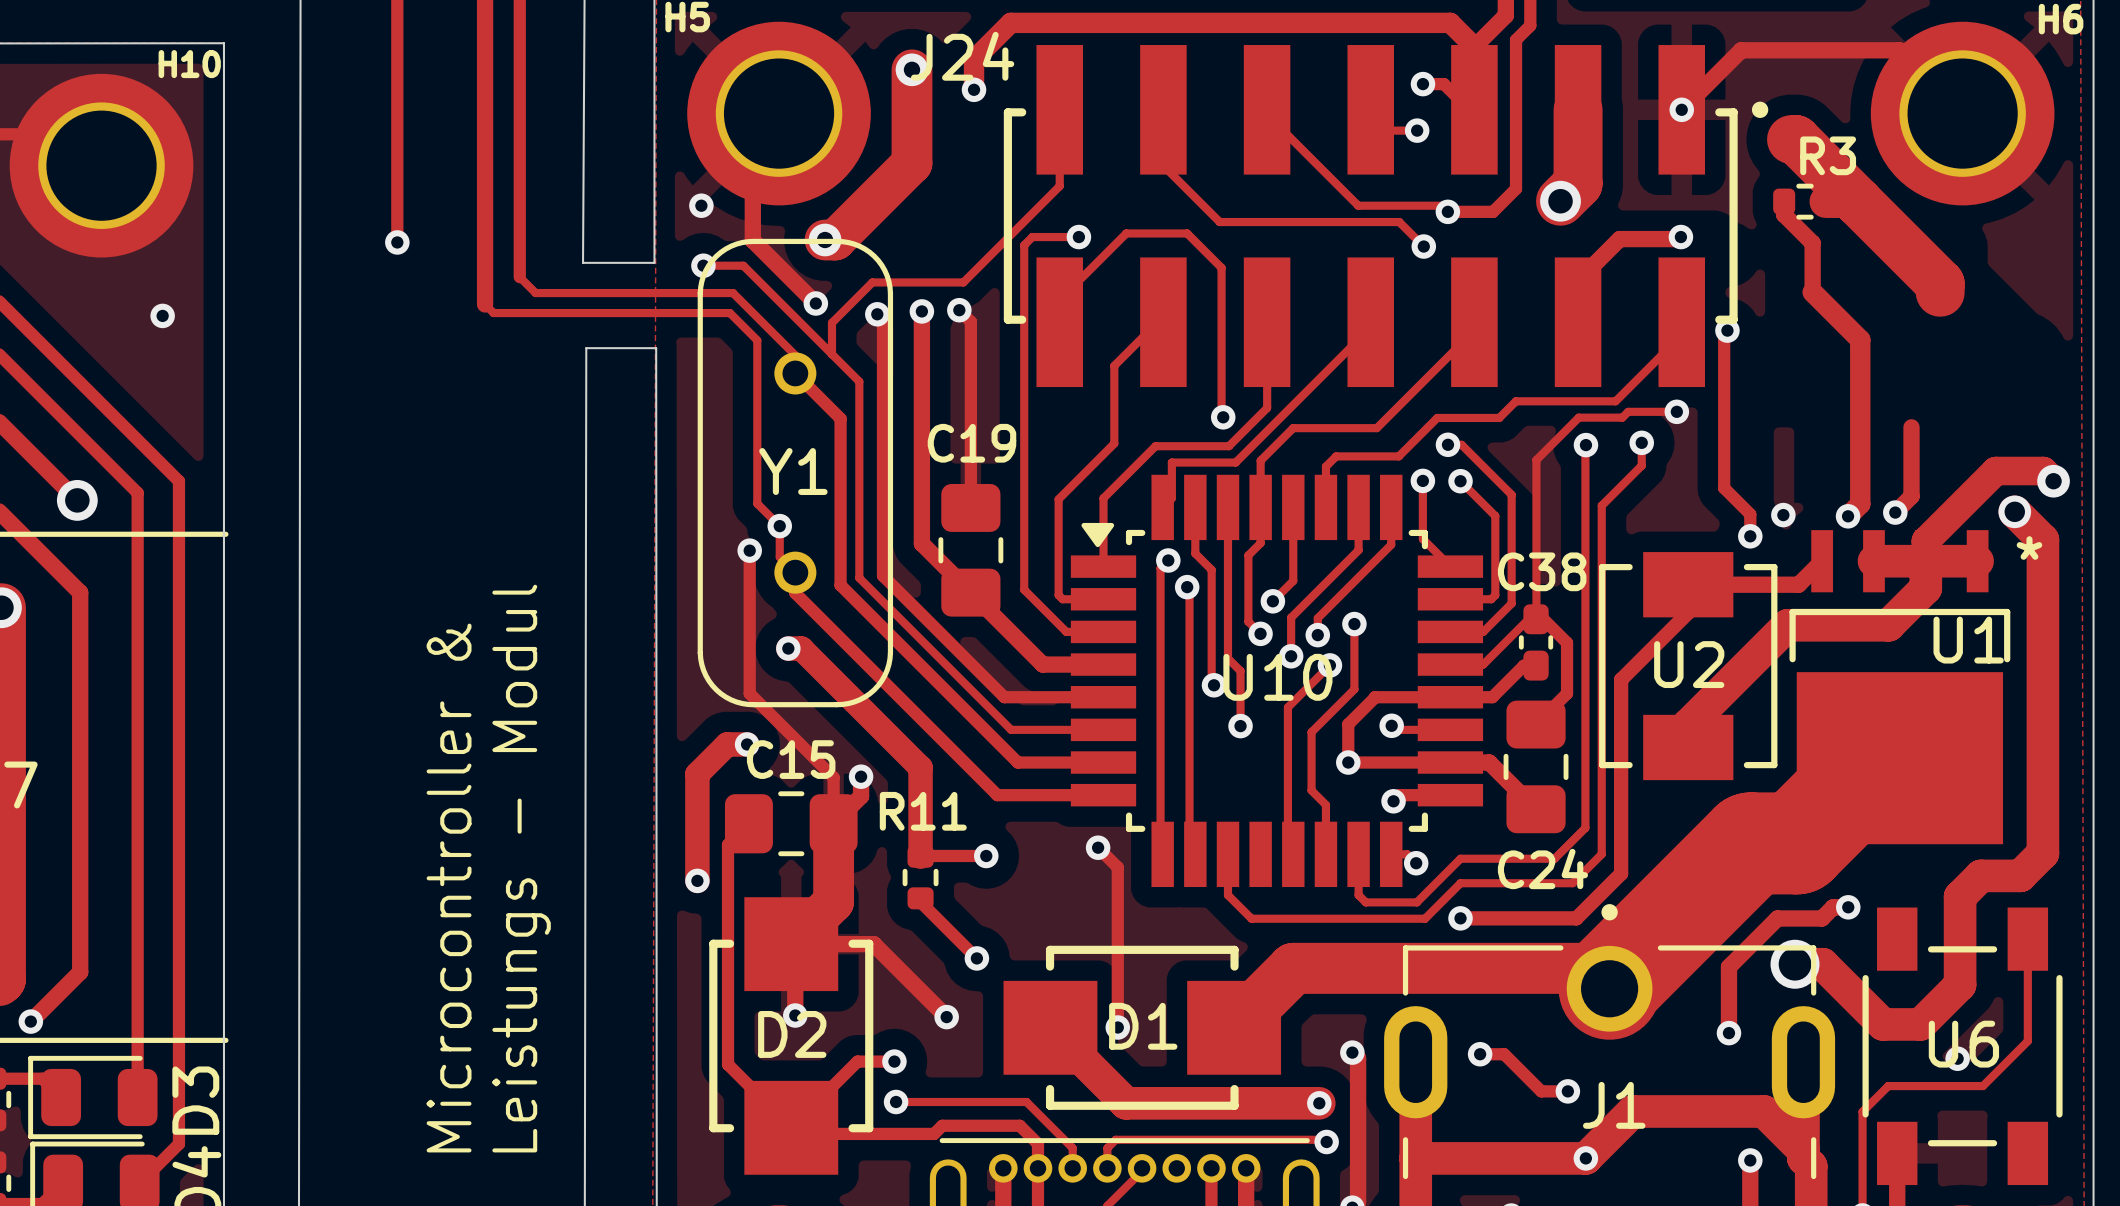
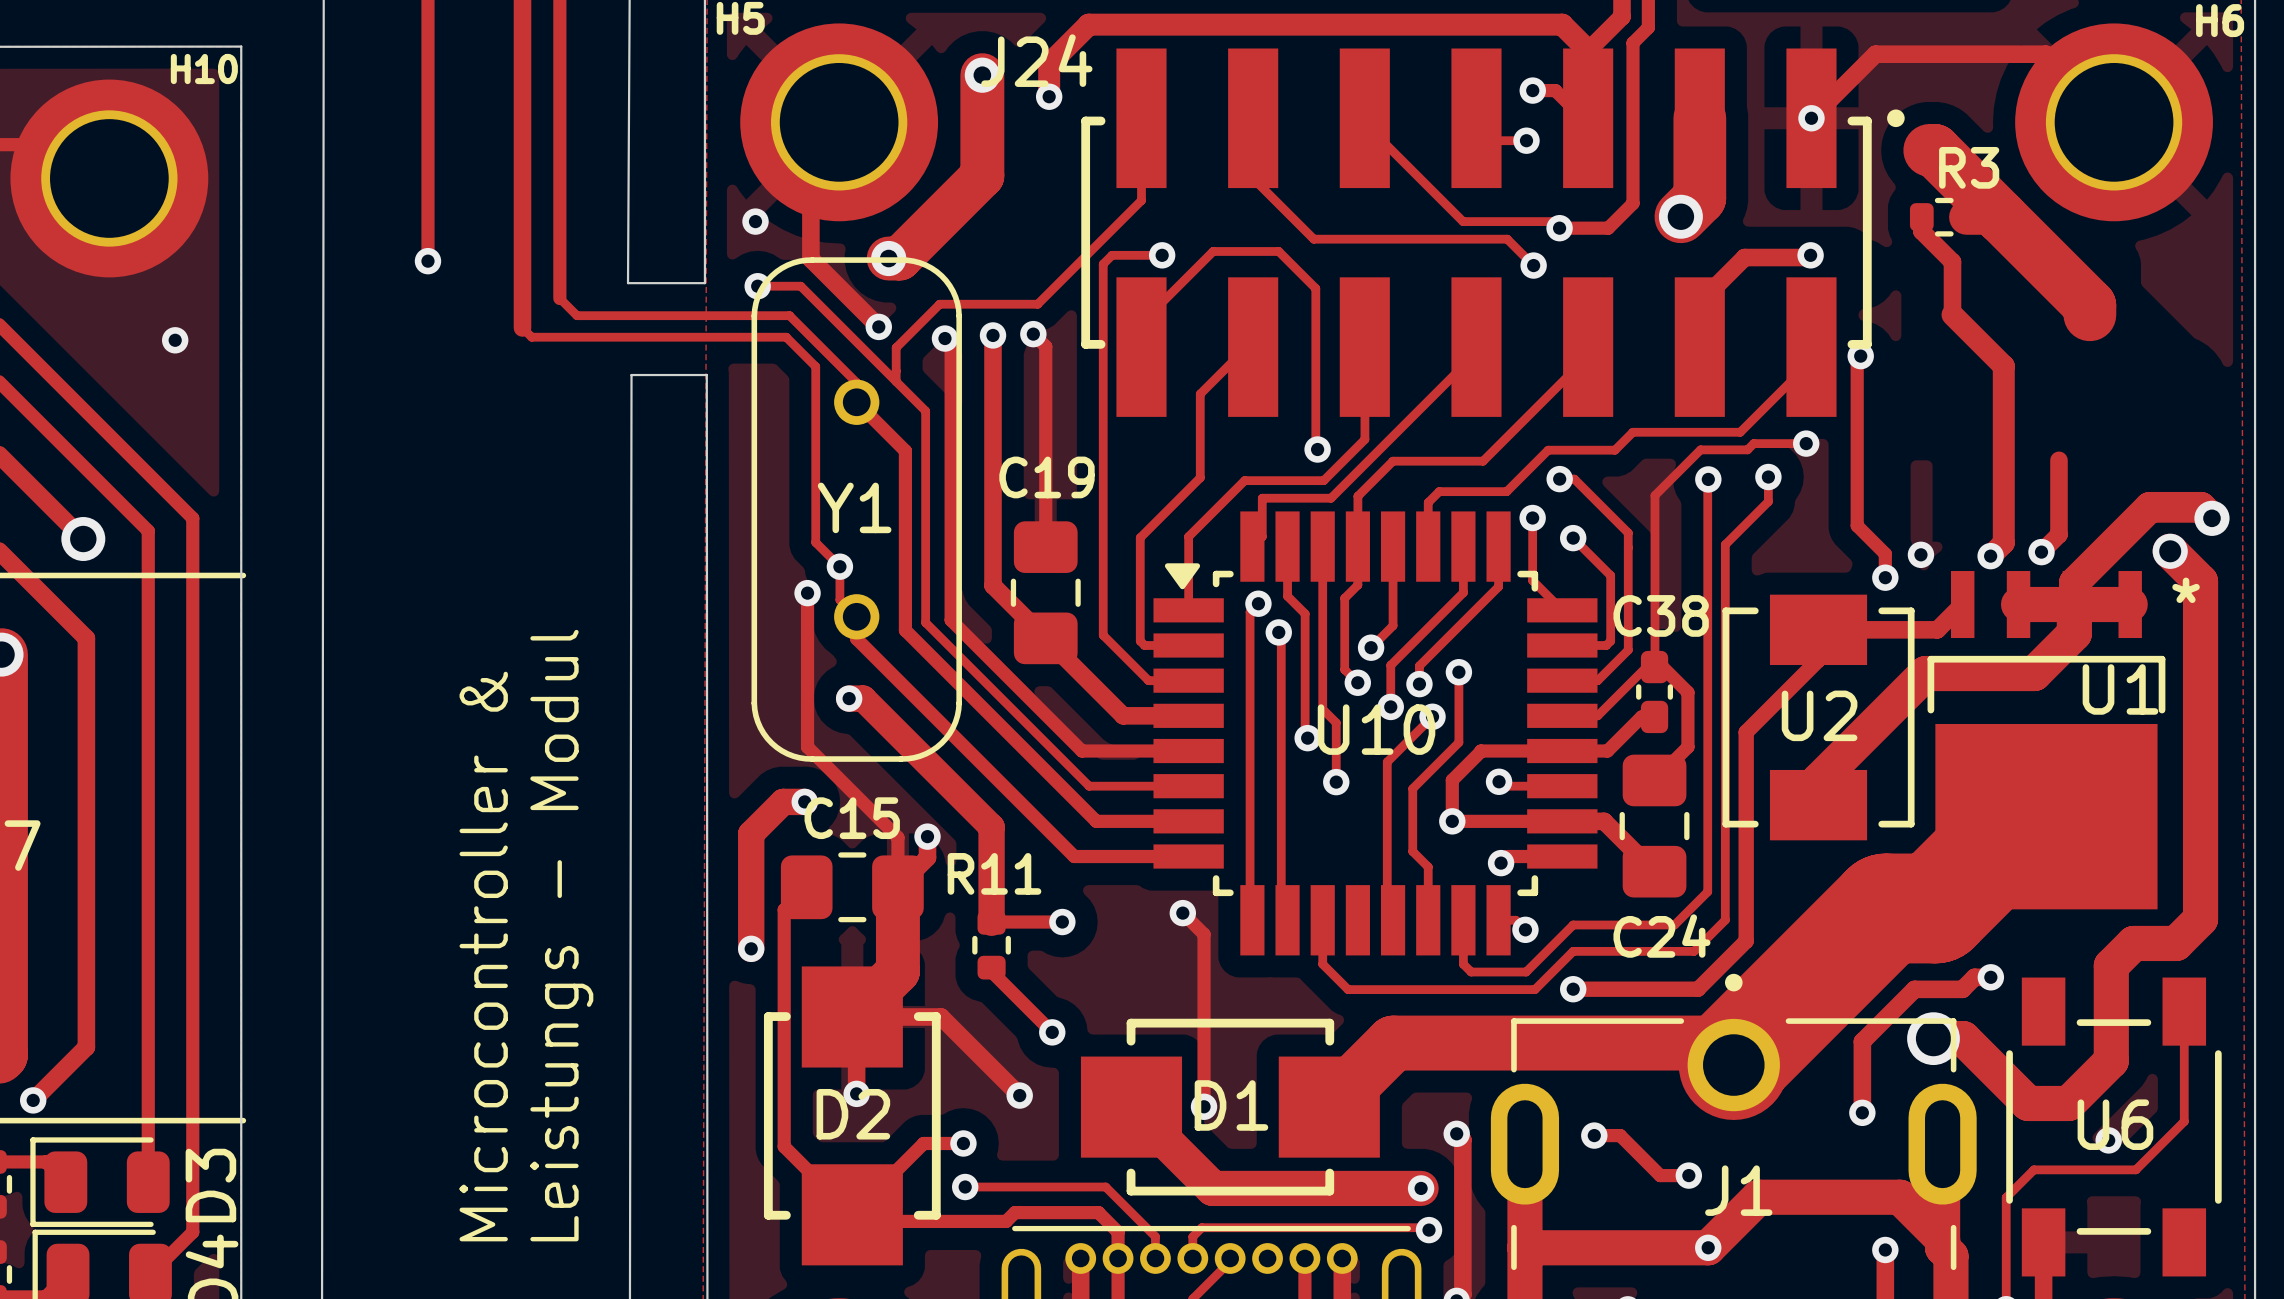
track: (1460, 481) (1495, 516) (1495, 534) -> (1573, 538) (1610, 575)
via position: (1460, 481) -> (1573, 538)

